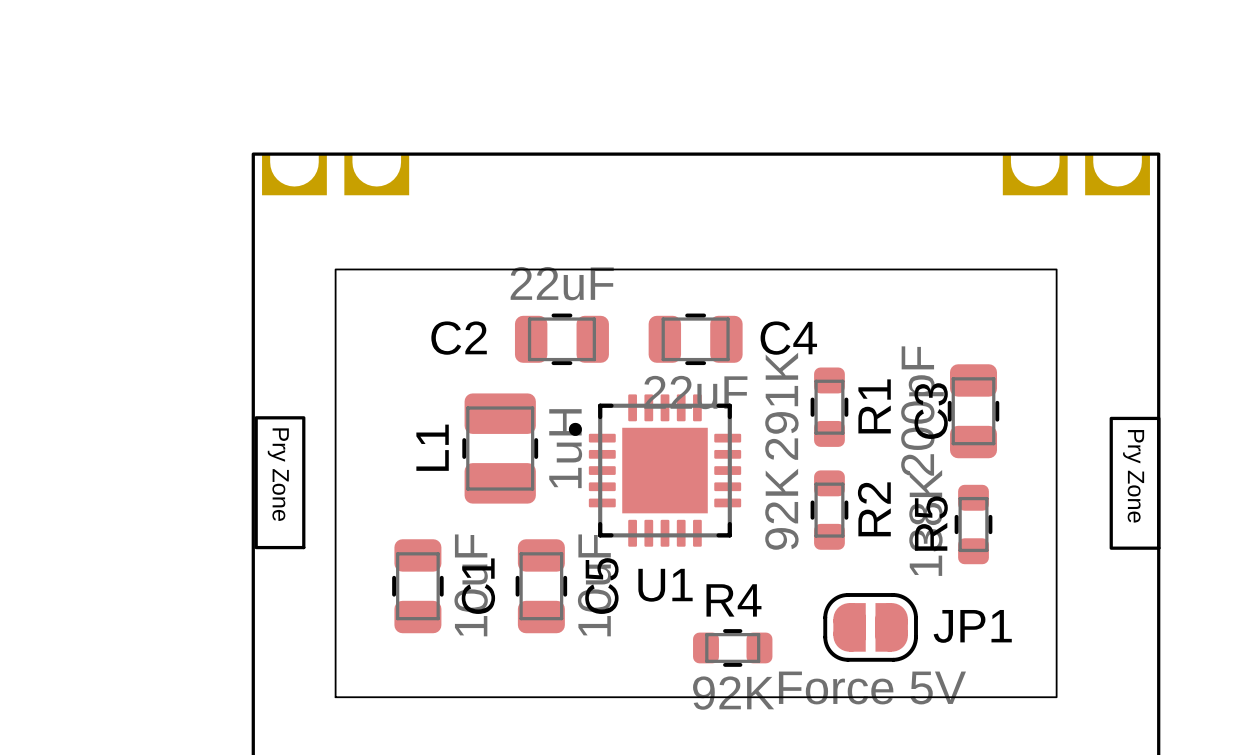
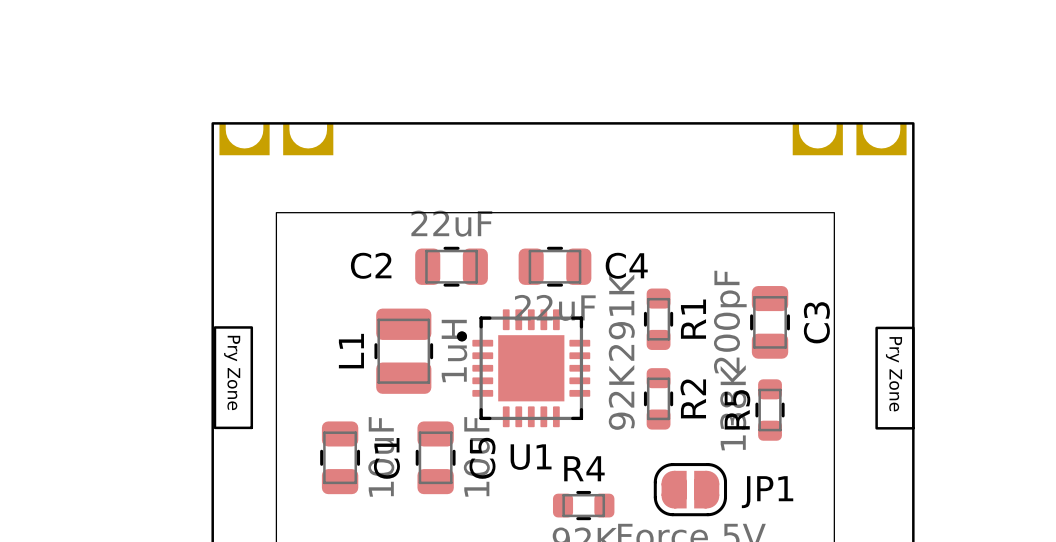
C3 name position: C3 (931, 411) -> C3 (816, 322)

